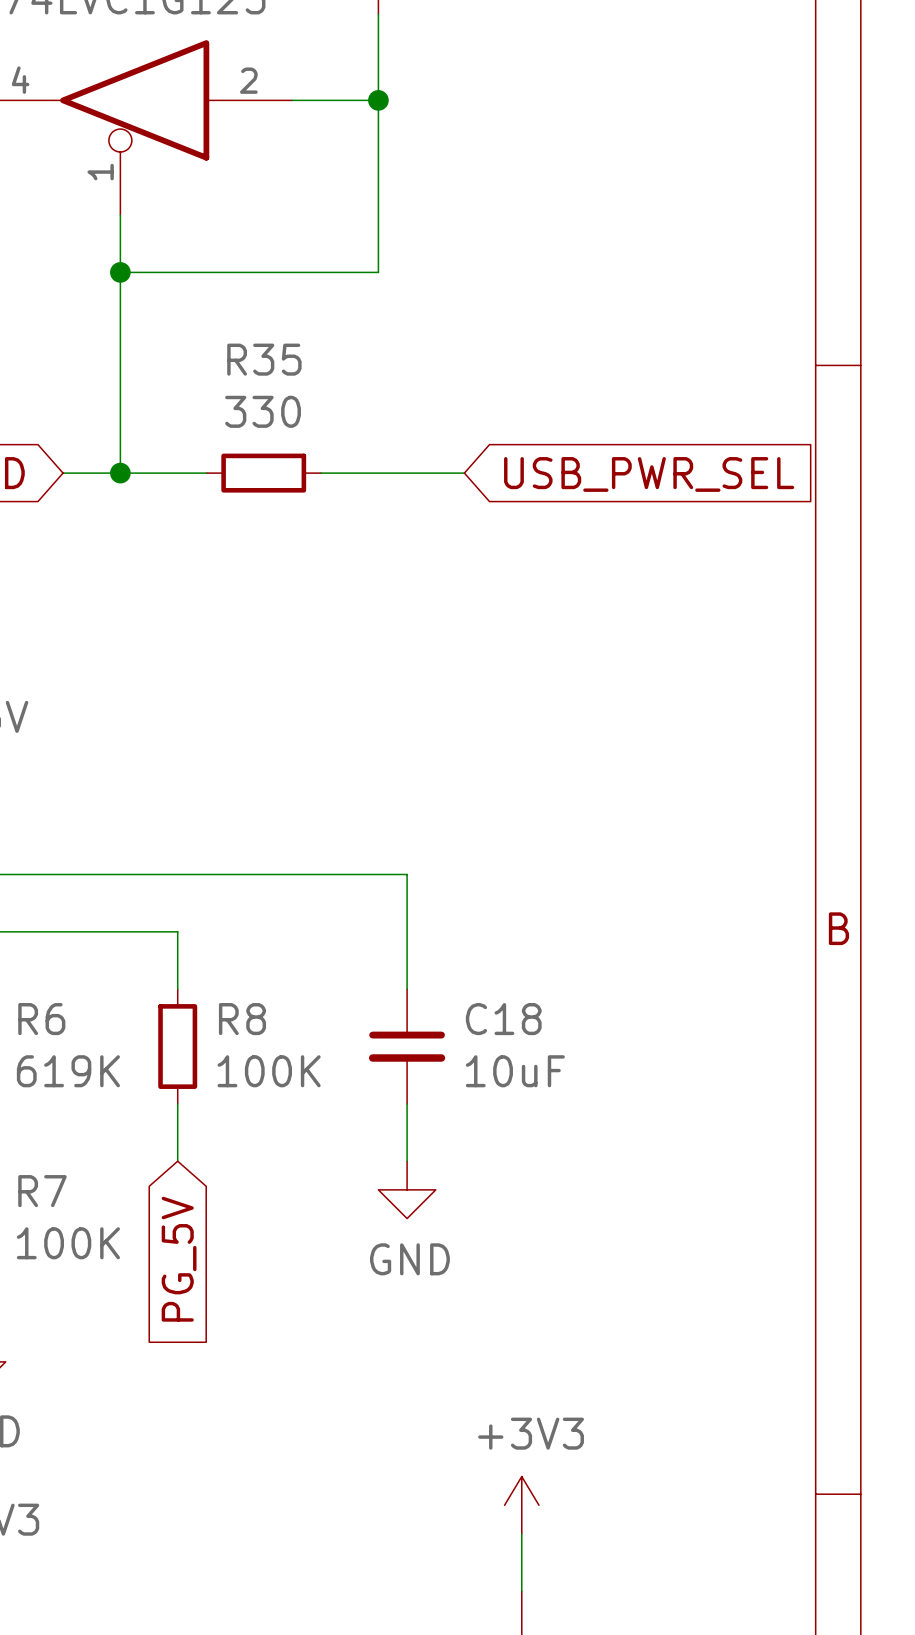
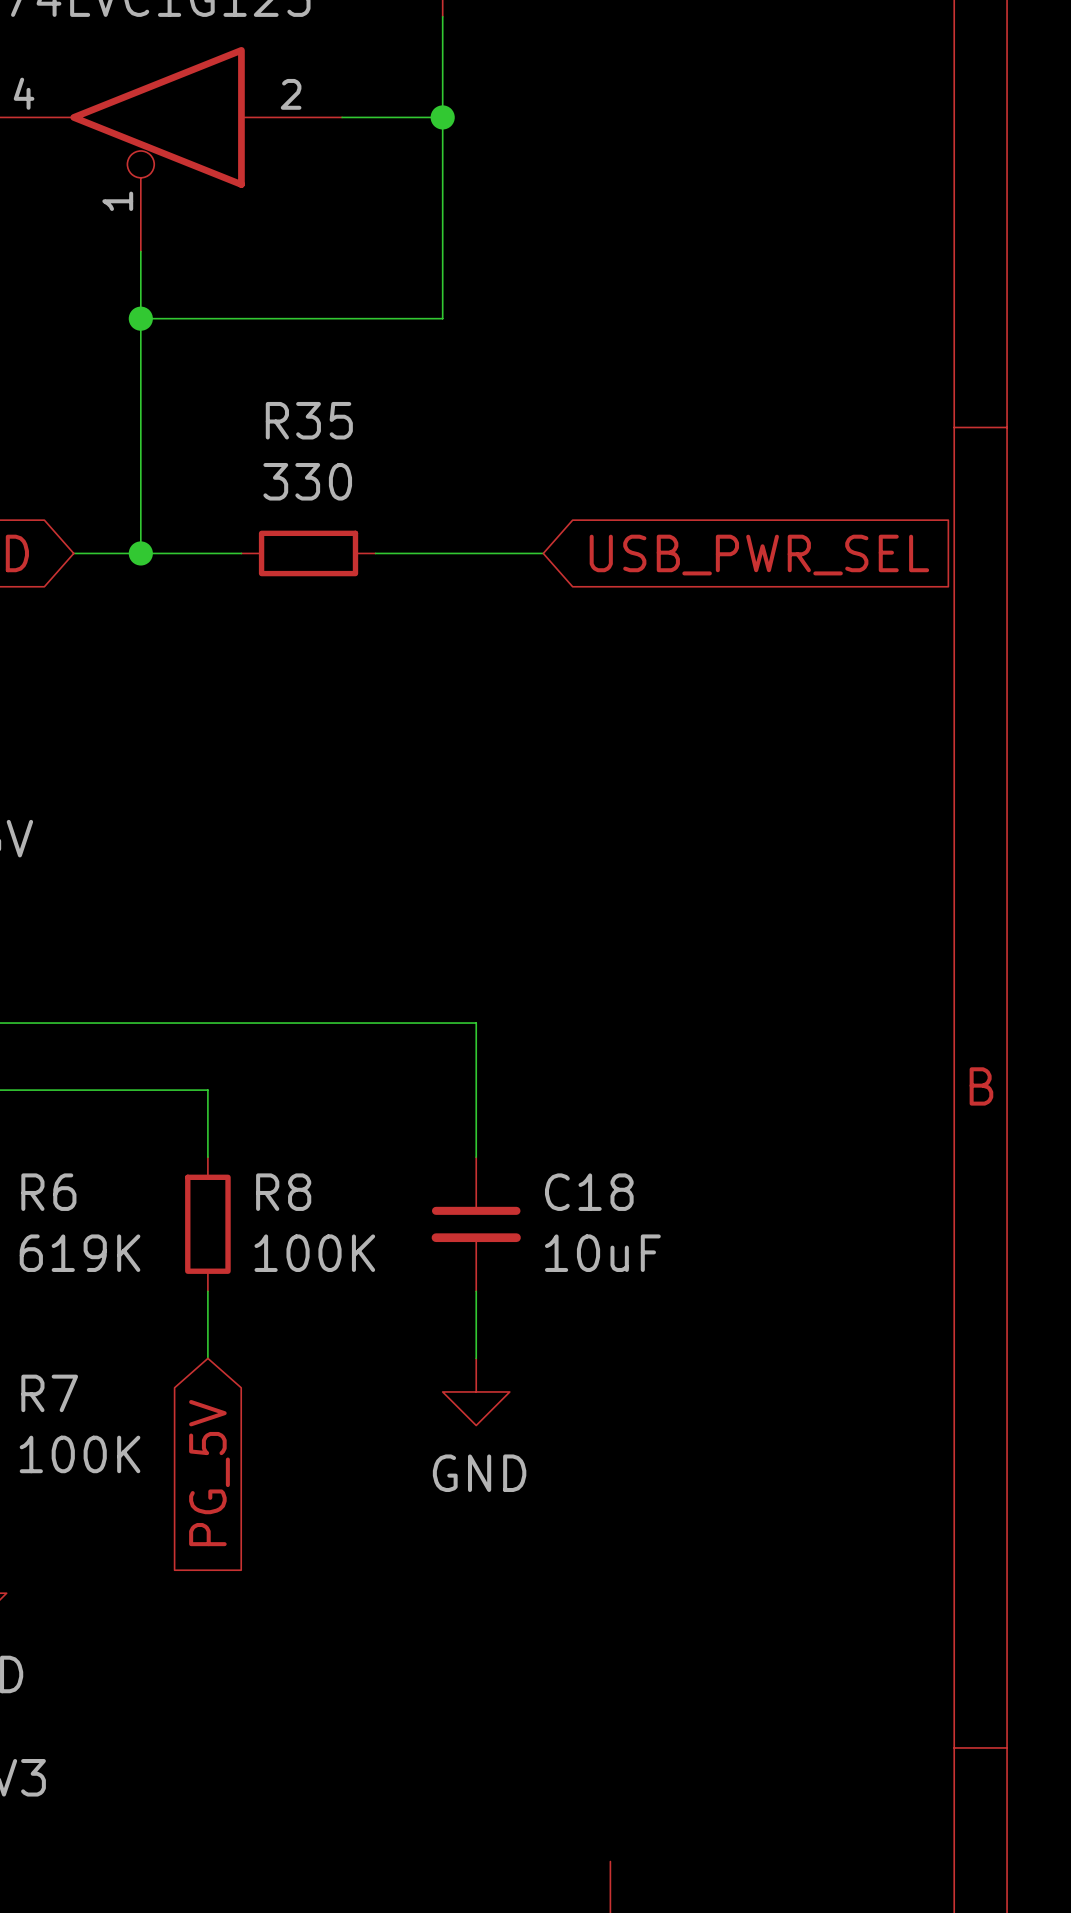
power symbol: +3V3 (521, 1505) -> none
wire: (521, 1533) (521, 1591) -> none

